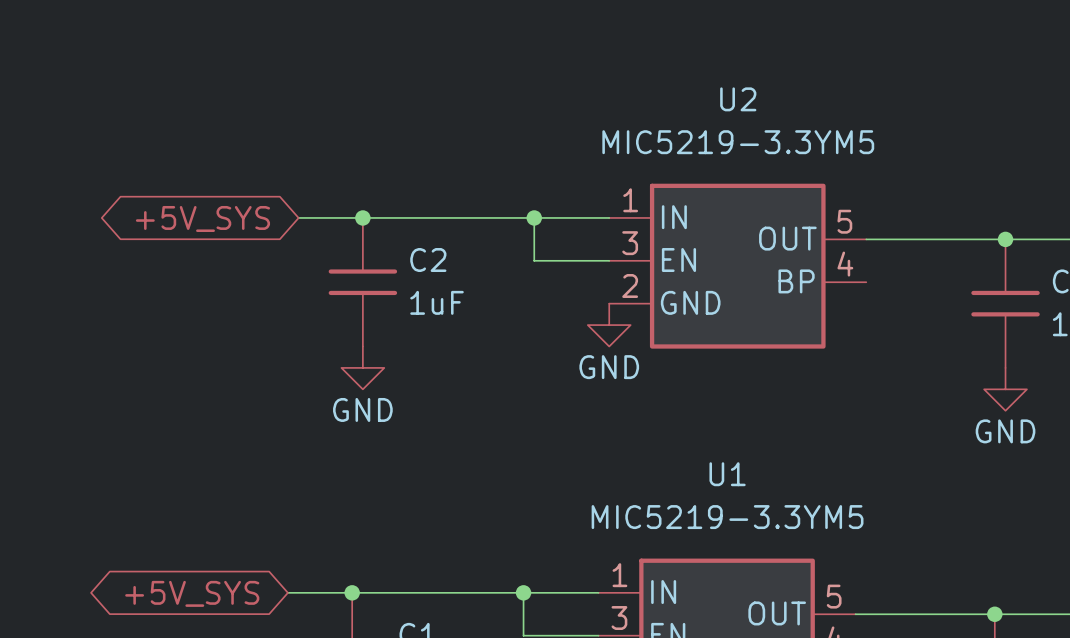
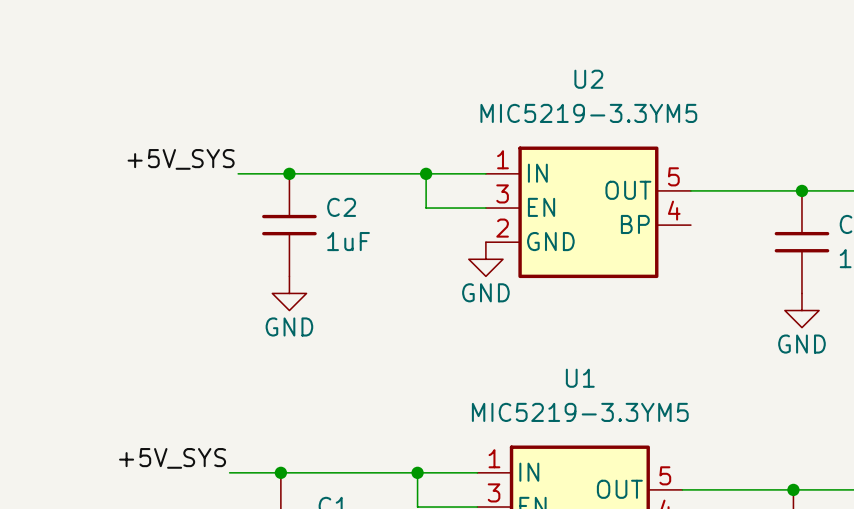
label: none -> +5V_SYS (181, 159)
global label: +5V_SYS (202, 218) -> none
label: none -> +5V_SYS (172, 458)
global label: +5V_SYS (192, 593) -> none

